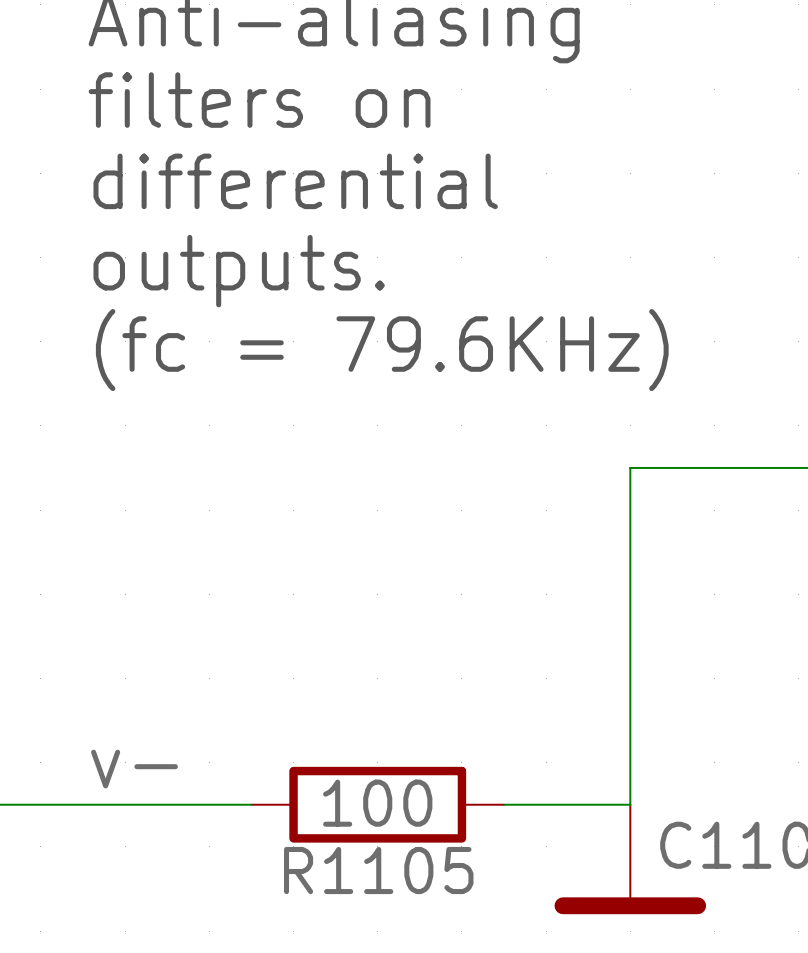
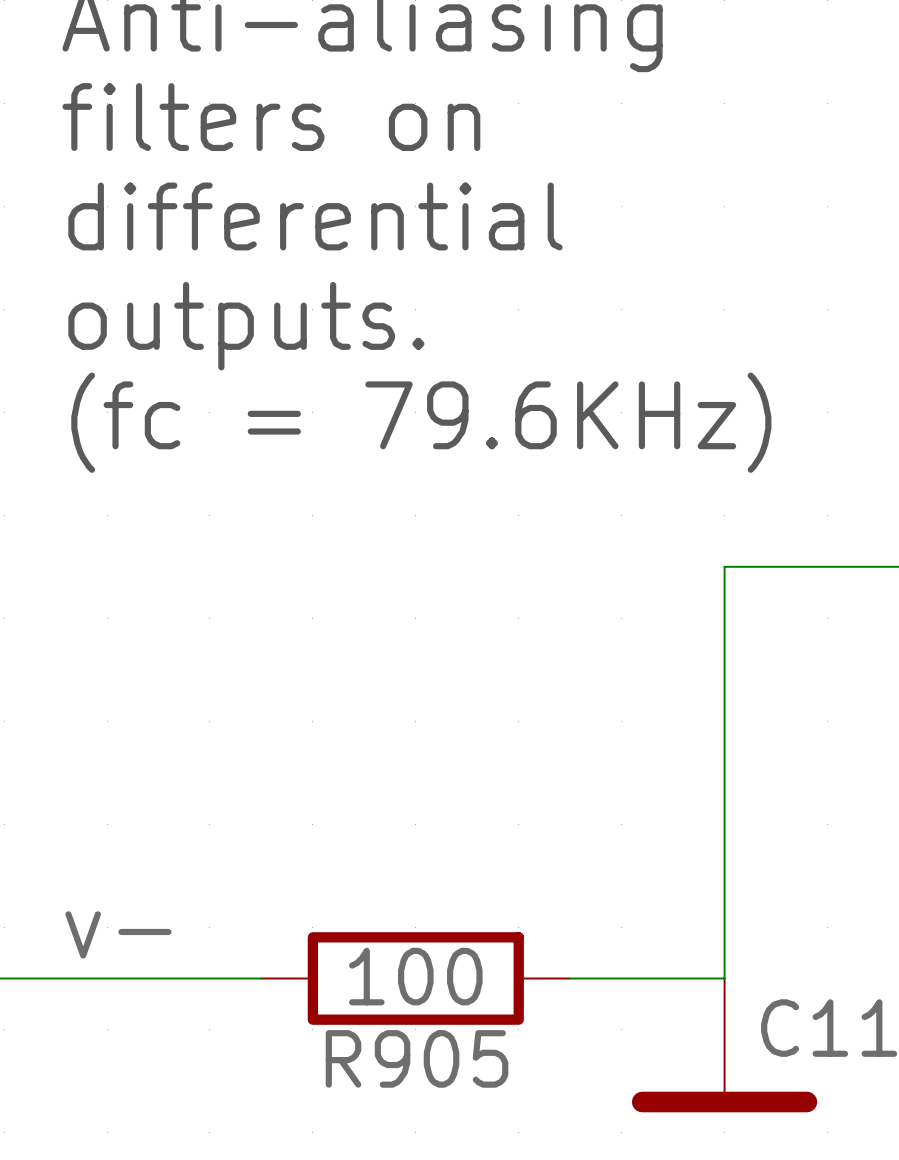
R1105 name: R1105 (378, 870) -> R905 (417, 1058)

